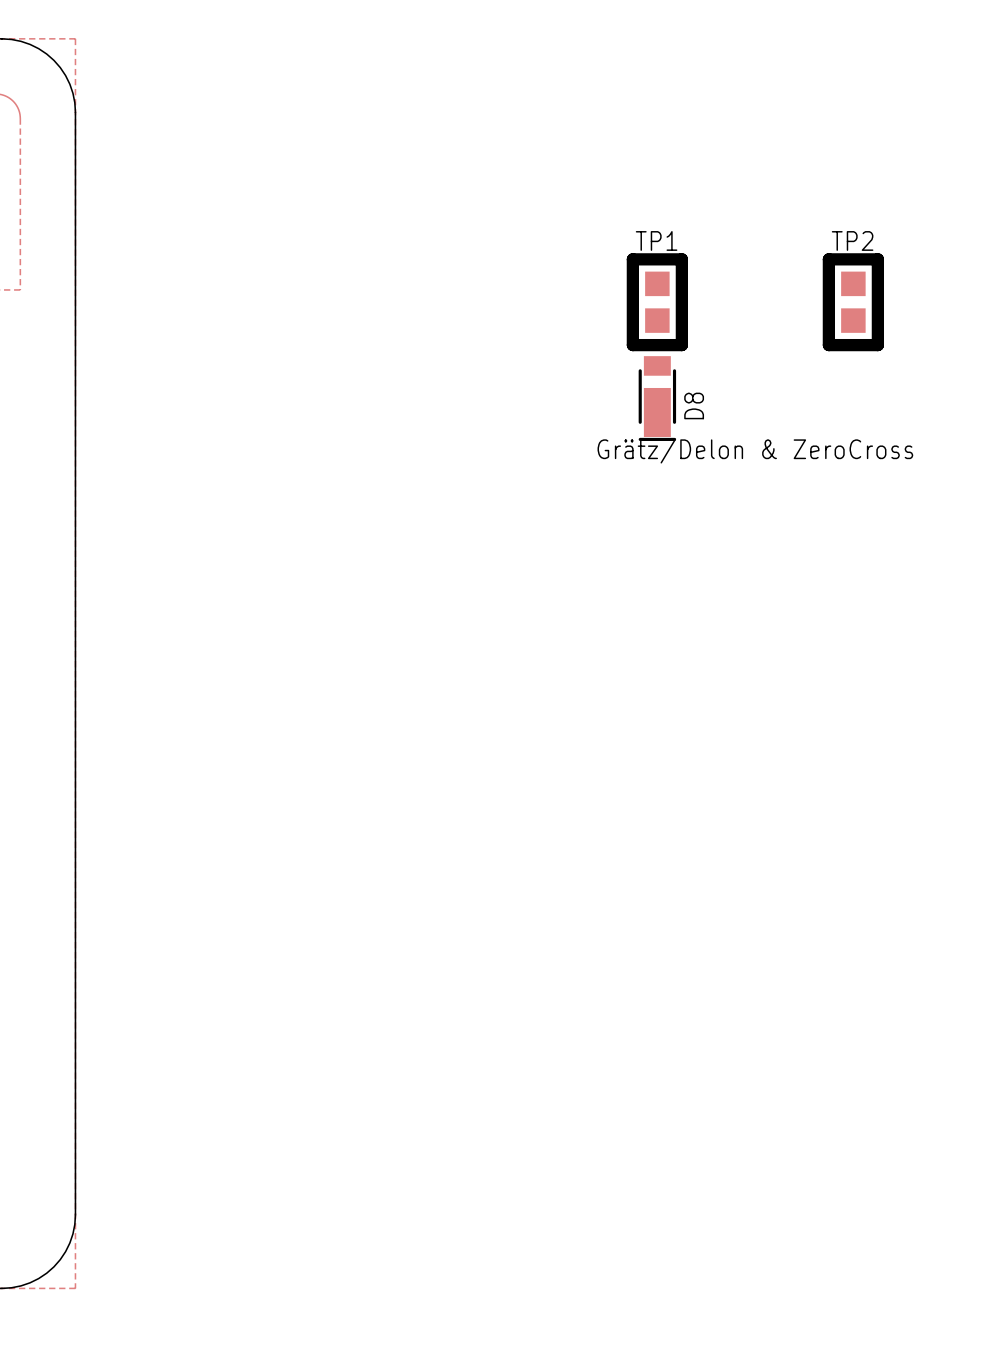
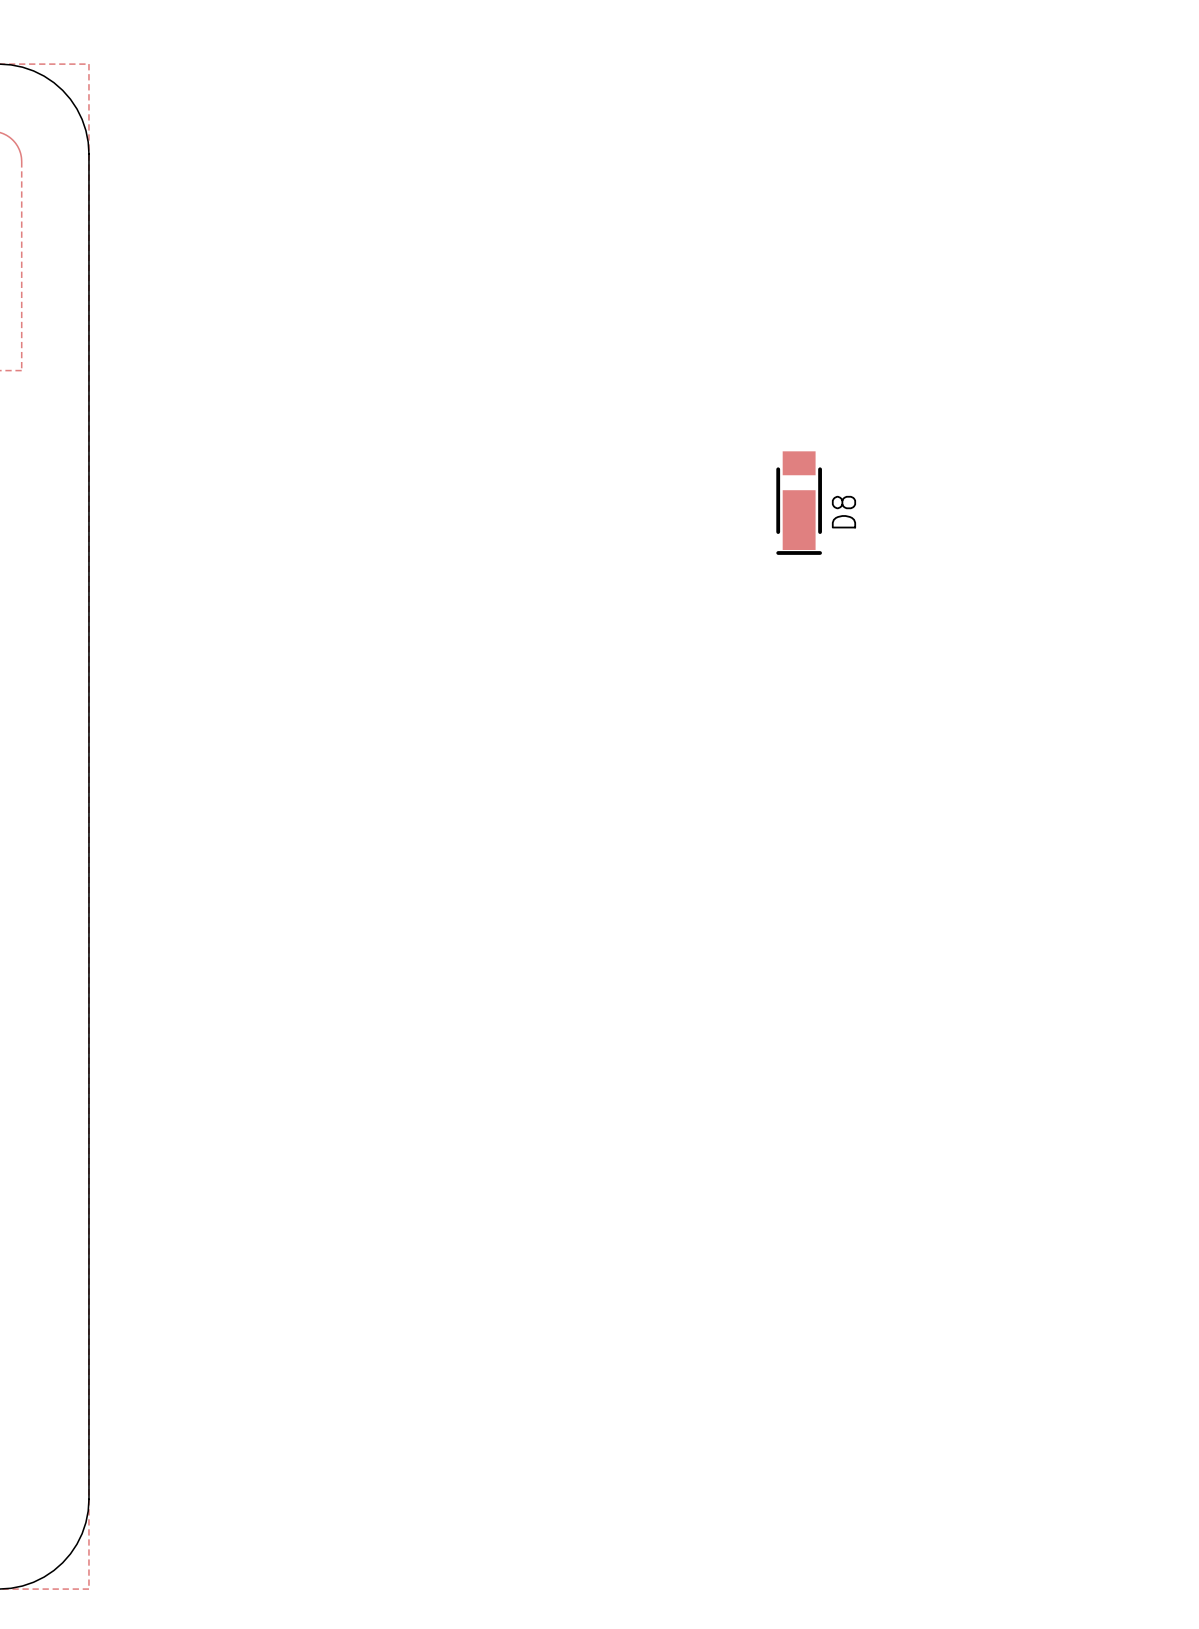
text: TP1 (656, 240) -> none
text: TP2 (852, 240) -> none
line: (632, 259) (681, 259) (681, 345) (632, 345) (632, 259) -> none
line: (828, 259) (877, 259) (877, 345) (828, 345) (828, 259) -> none
part: (657, 283) -> none
part: (853, 283) -> none
part: (657, 320) -> none
part: (853, 320) -> none
text: Grätz/Delon & ZeroCross (755, 450) -> none

